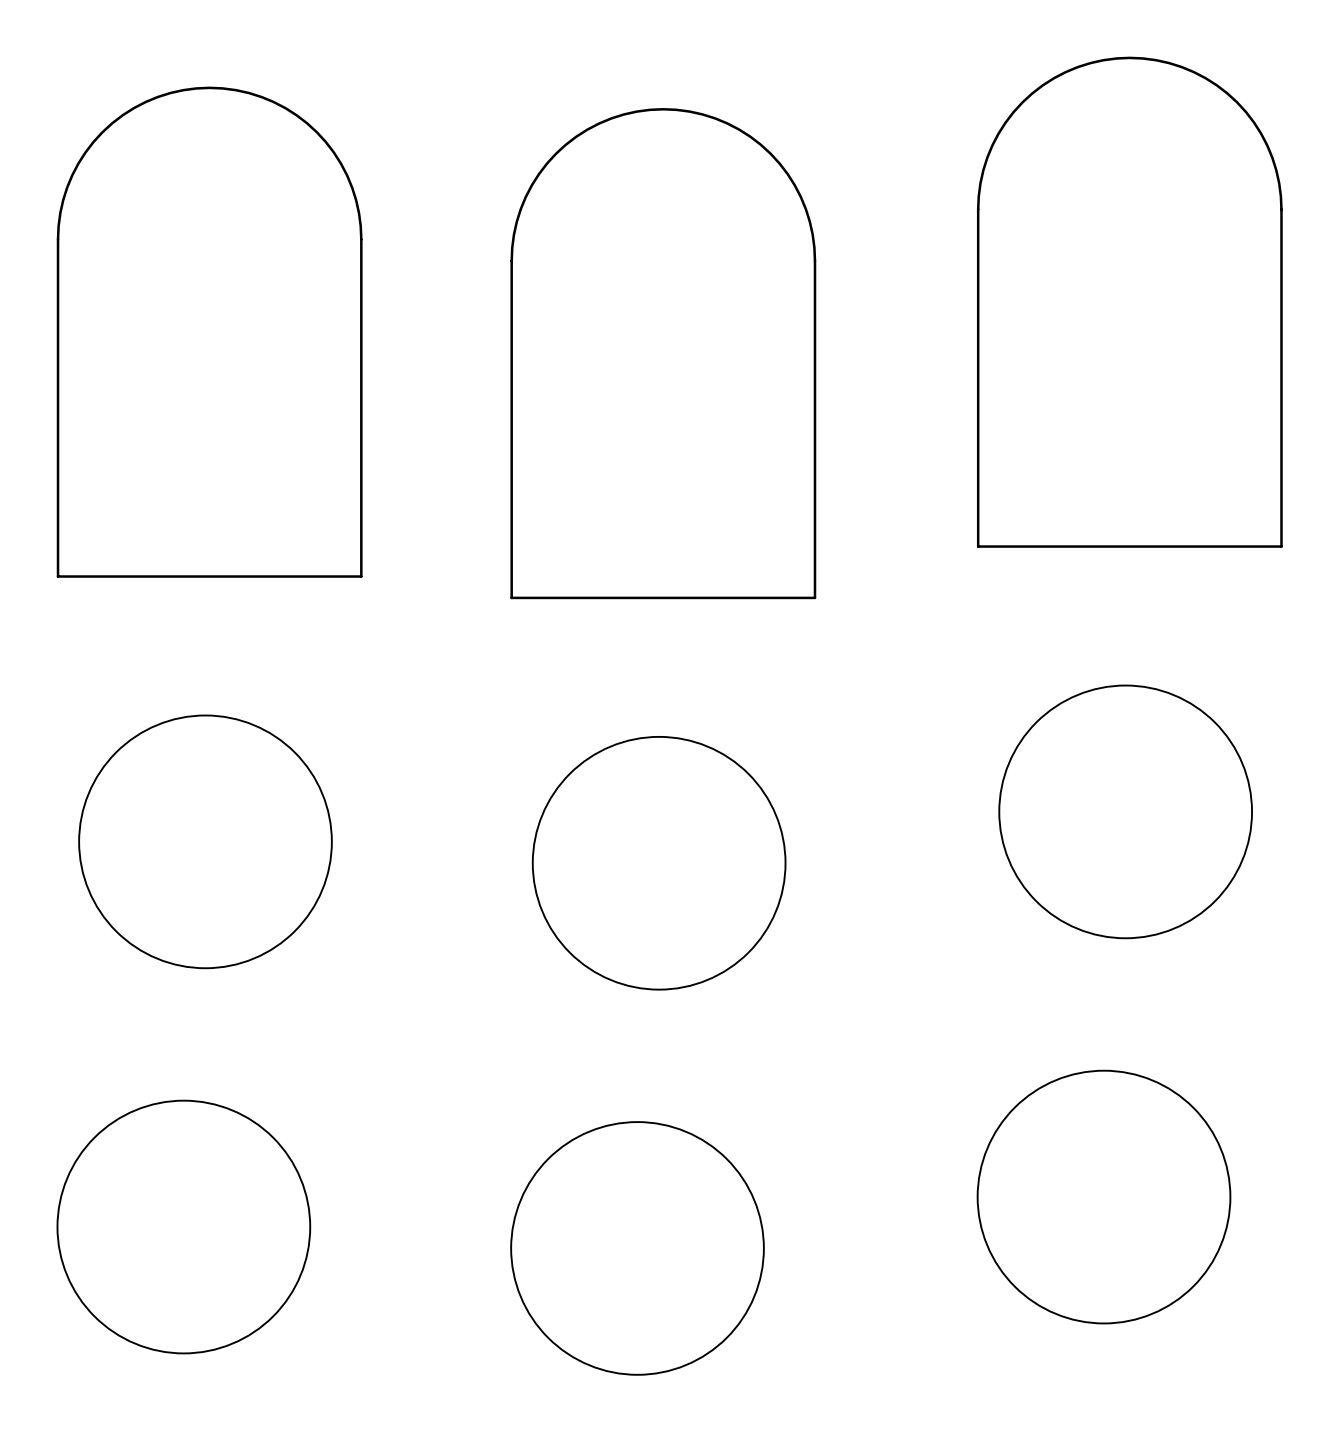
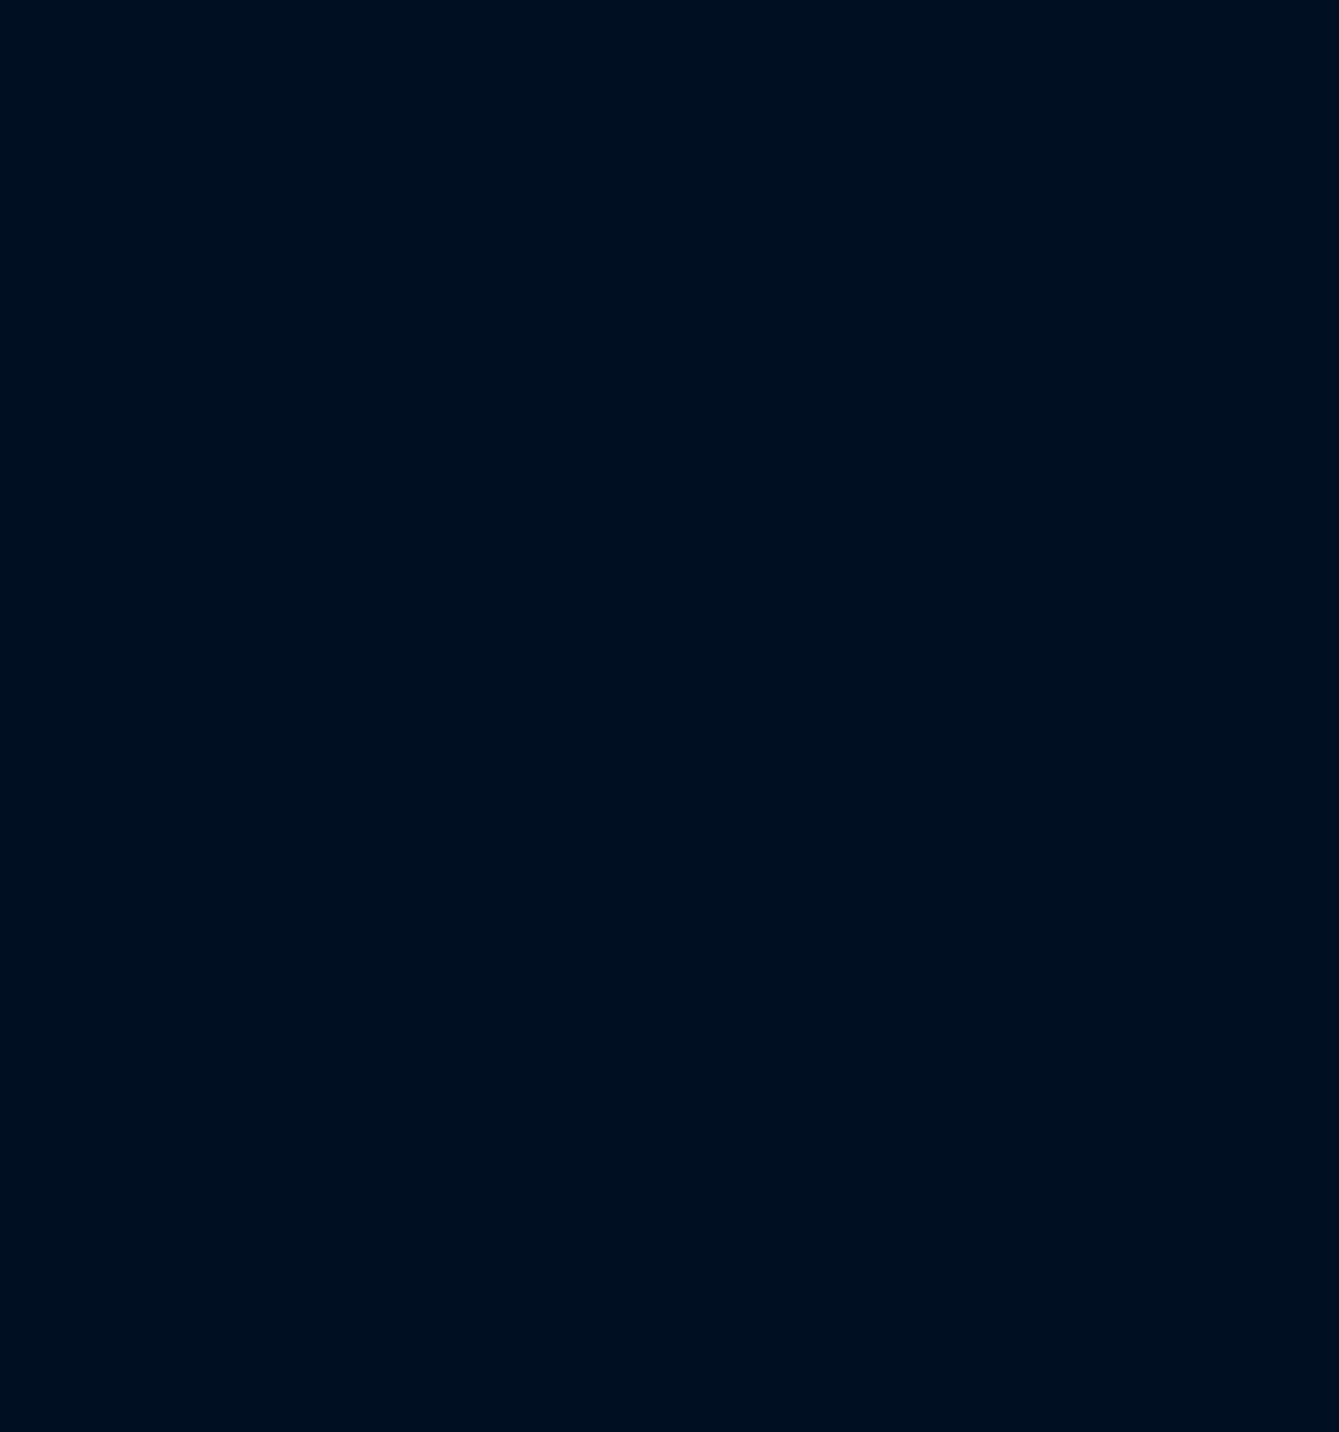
board edge: (978, 209) (978, 546) (1281, 546) (1280, 196) (1272, 157) (1261, 133) (1246, 112) (1216, 85) (1193, 72) (1169, 63) (1129, 57) (1103, 60) (1077, 67) (1042, 85) (1022, 102) (1005, 122) (992, 145) (983, 170) (978, 209) -> none
board edge: (58, 239) (58, 576) (361, 576) (360, 226) (352, 187) (341, 163) (325, 142) (307, 123) (285, 108) (248, 93) (222, 88) (196, 88) (157, 97) (122, 115) (102, 132) (85, 152) (67, 187) (60, 213) (58, 239) -> none
board edge: (511, 260) (511, 597) (814, 597) (814, 247) (805, 209) (794, 185) (779, 163) (760, 144) (739, 129) (702, 114) (663, 109) (637, 111) (611, 118) (587, 129) (565, 144) (539, 173) (520, 209) (513, 234) (511, 260) -> none
round board edge: [998, 684, 1253, 940] -> none
round board edge: [78, 714, 333, 970] -> none
round board edge: [531, 736, 787, 991] -> none
round board edge: [976, 1069, 1232, 1325] -> none
round board edge: [56, 1099, 312, 1355] -> none
round board edge: [510, 1121, 765, 1376] -> none

